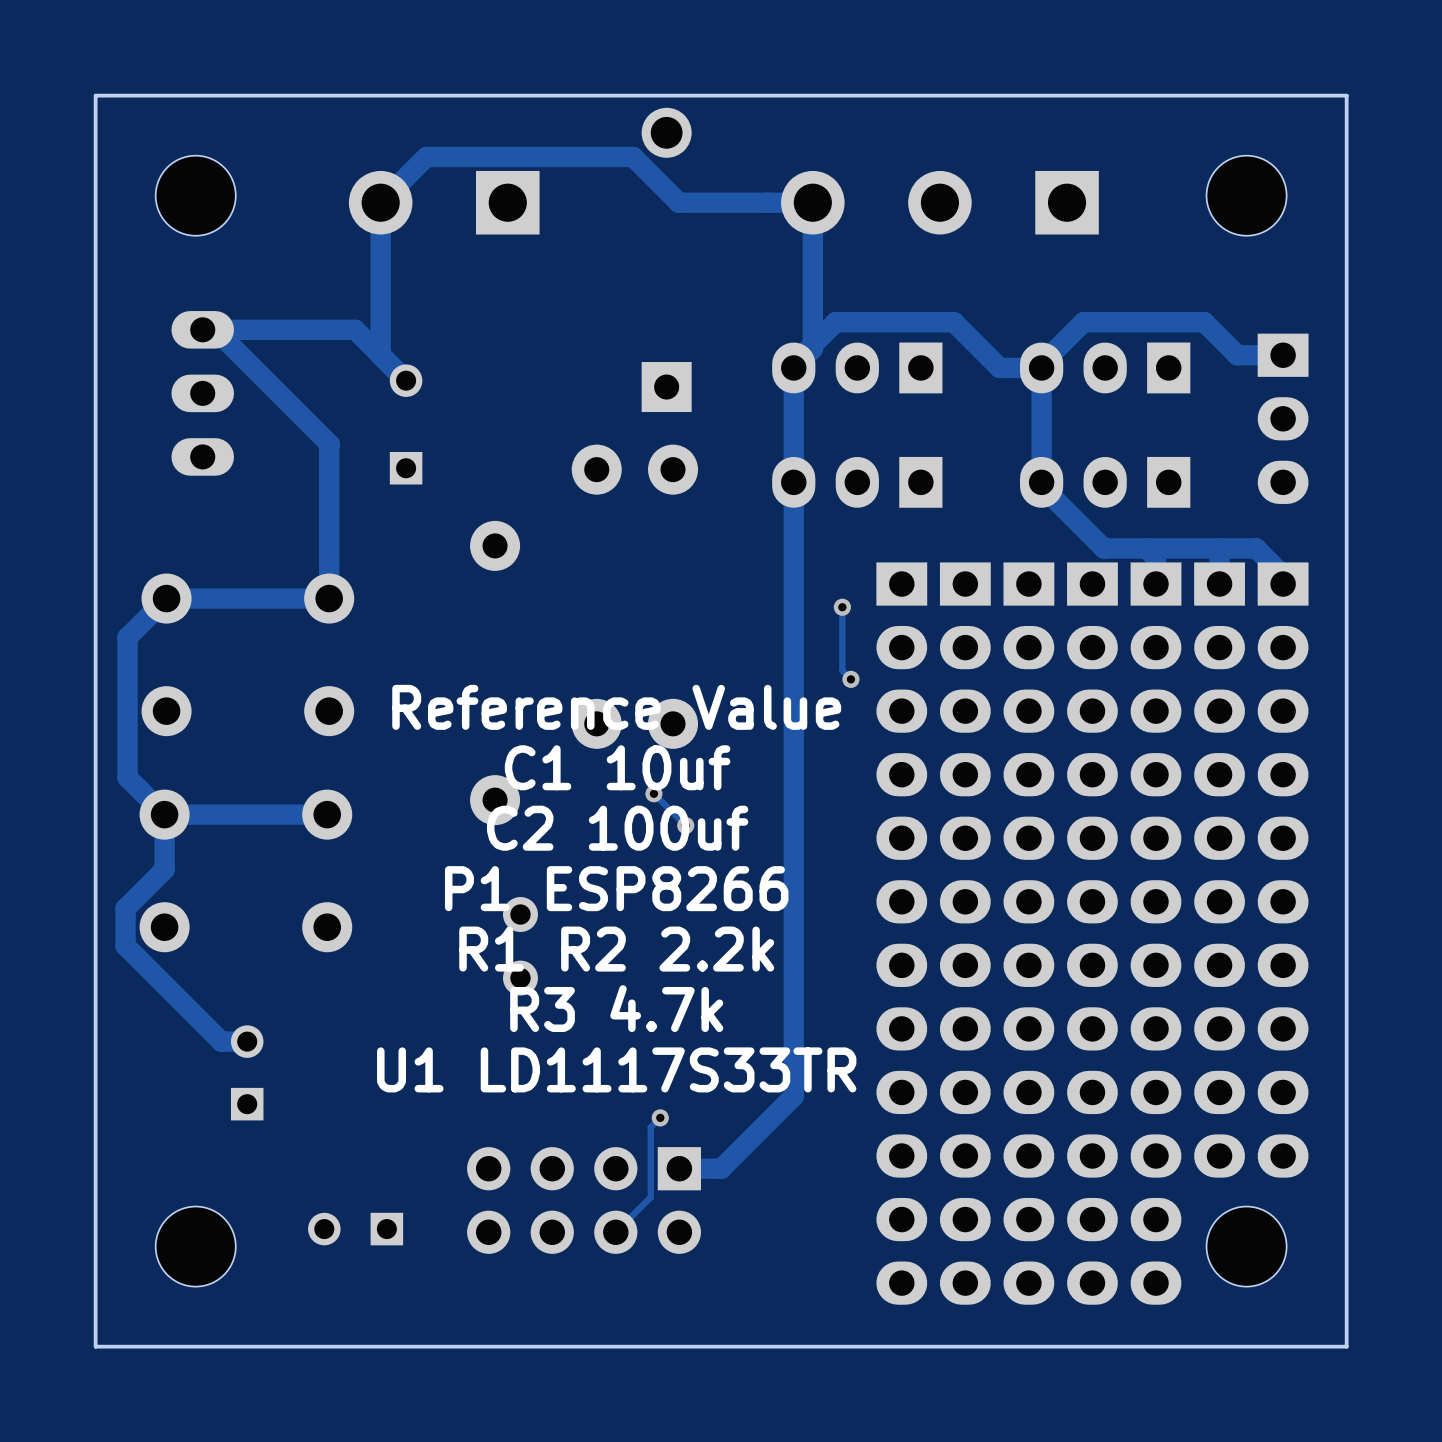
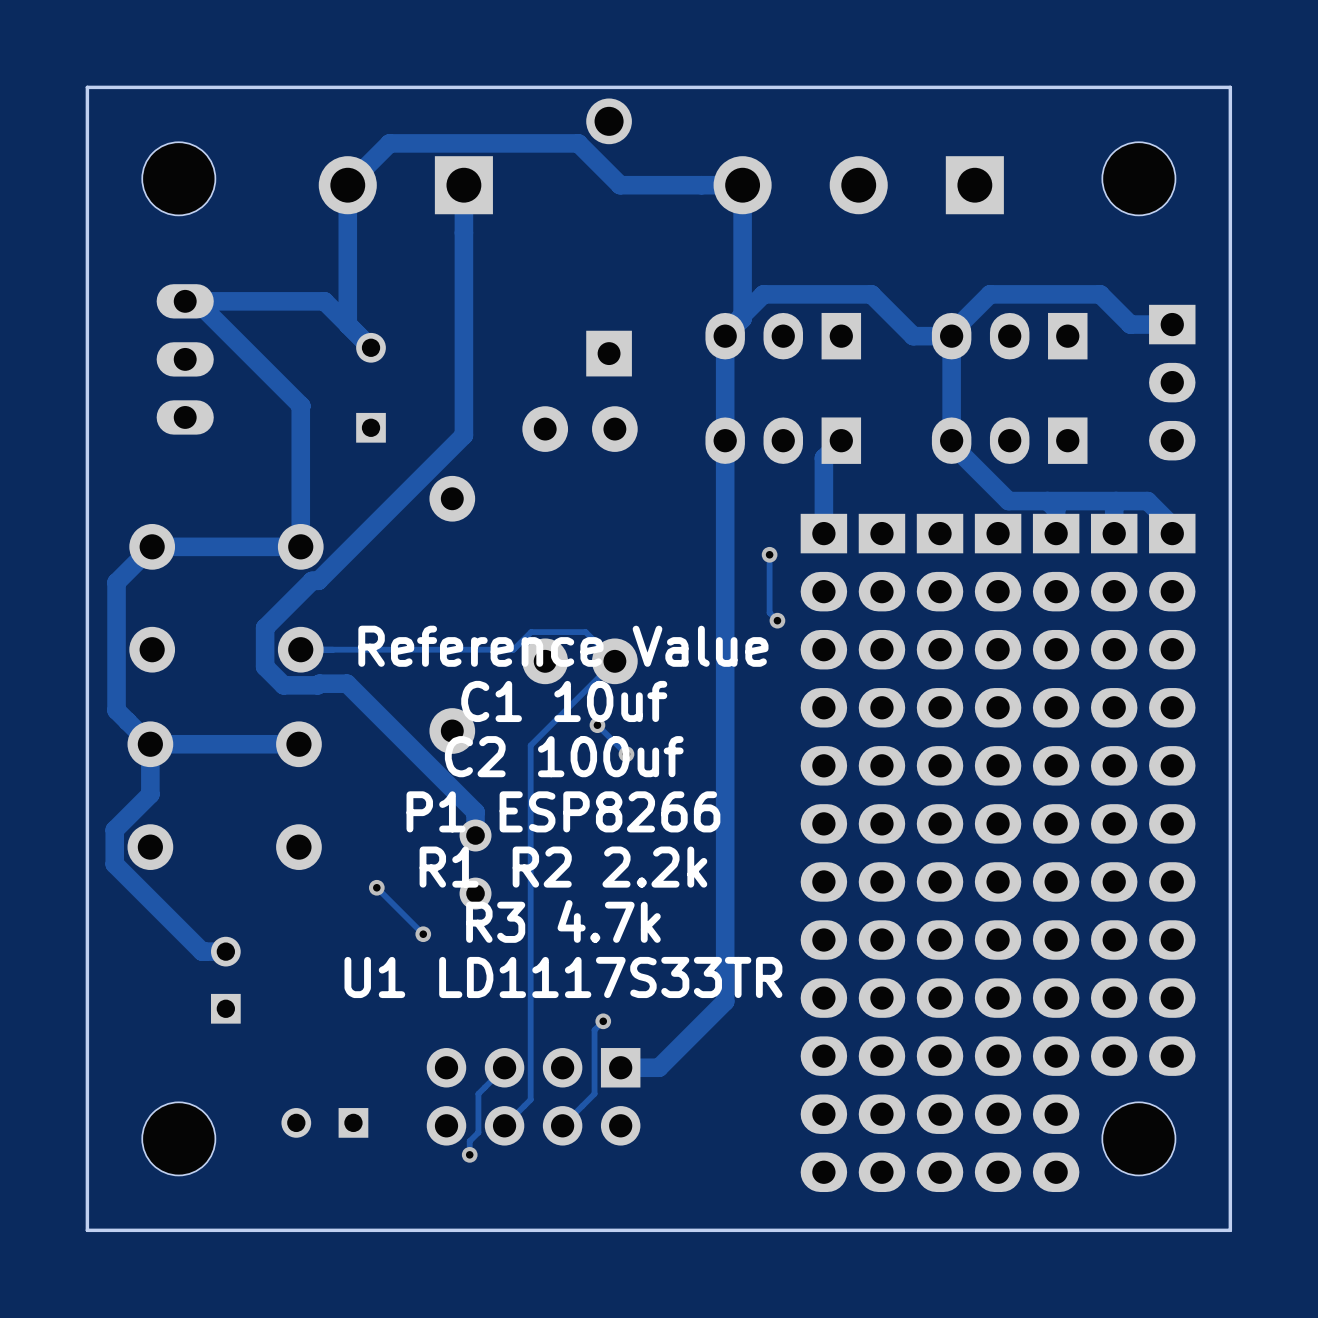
track: none -> (463, 185) (463, 435) (318, 580) (312, 580) (265, 627) (265, 666) (283, 685) (347, 683) (475, 812) (475, 835)
track: none -> (841, 440) (823, 458) (823, 533)
track: none -> (300, 649) (513, 649) (531, 632) (585, 632) (614, 661) (530, 745) (530, 1099) (504, 1125)
track: none -> (376, 887) (423, 934)
via: none -> (376, 887)
via: none -> (423, 934)
track: none -> (504, 1067) (478, 1093) (478, 1132) (469, 1141) (469, 1154)
via: none -> (469, 1154)

